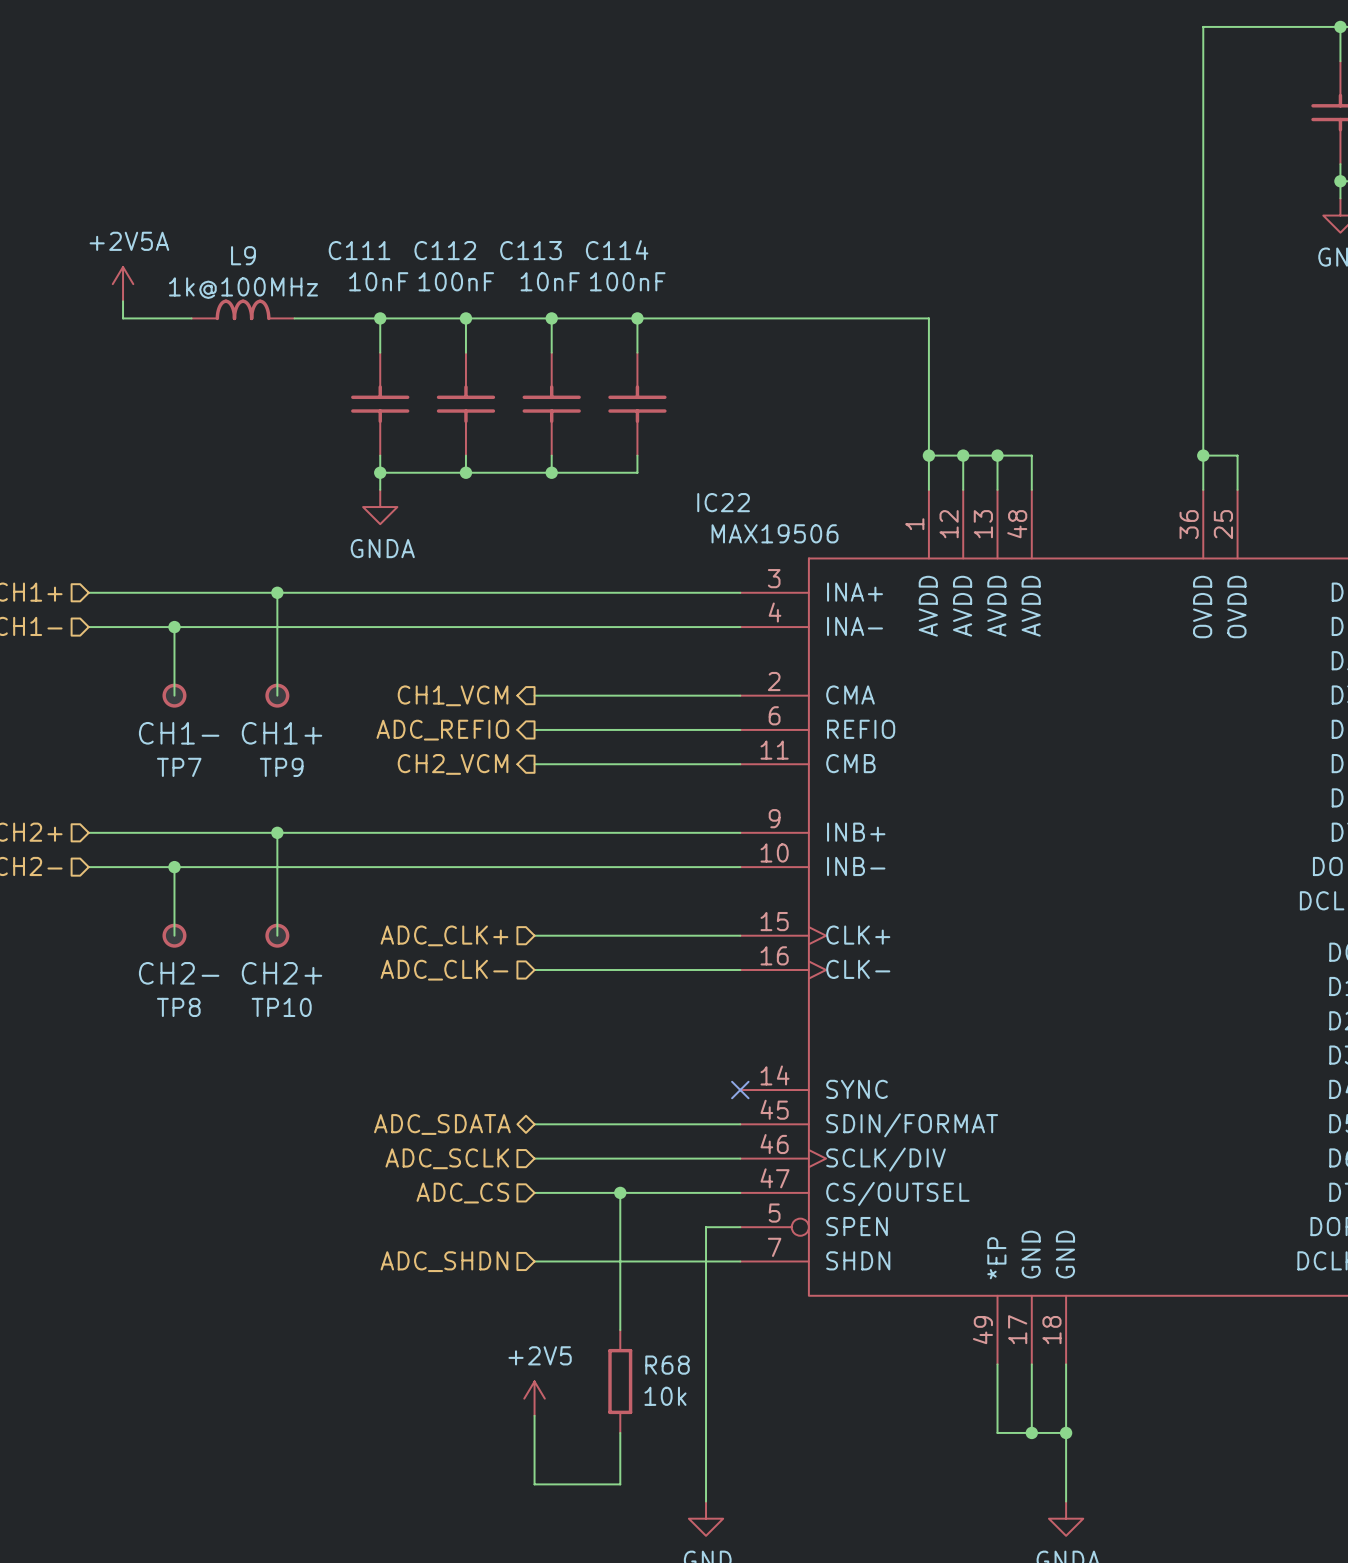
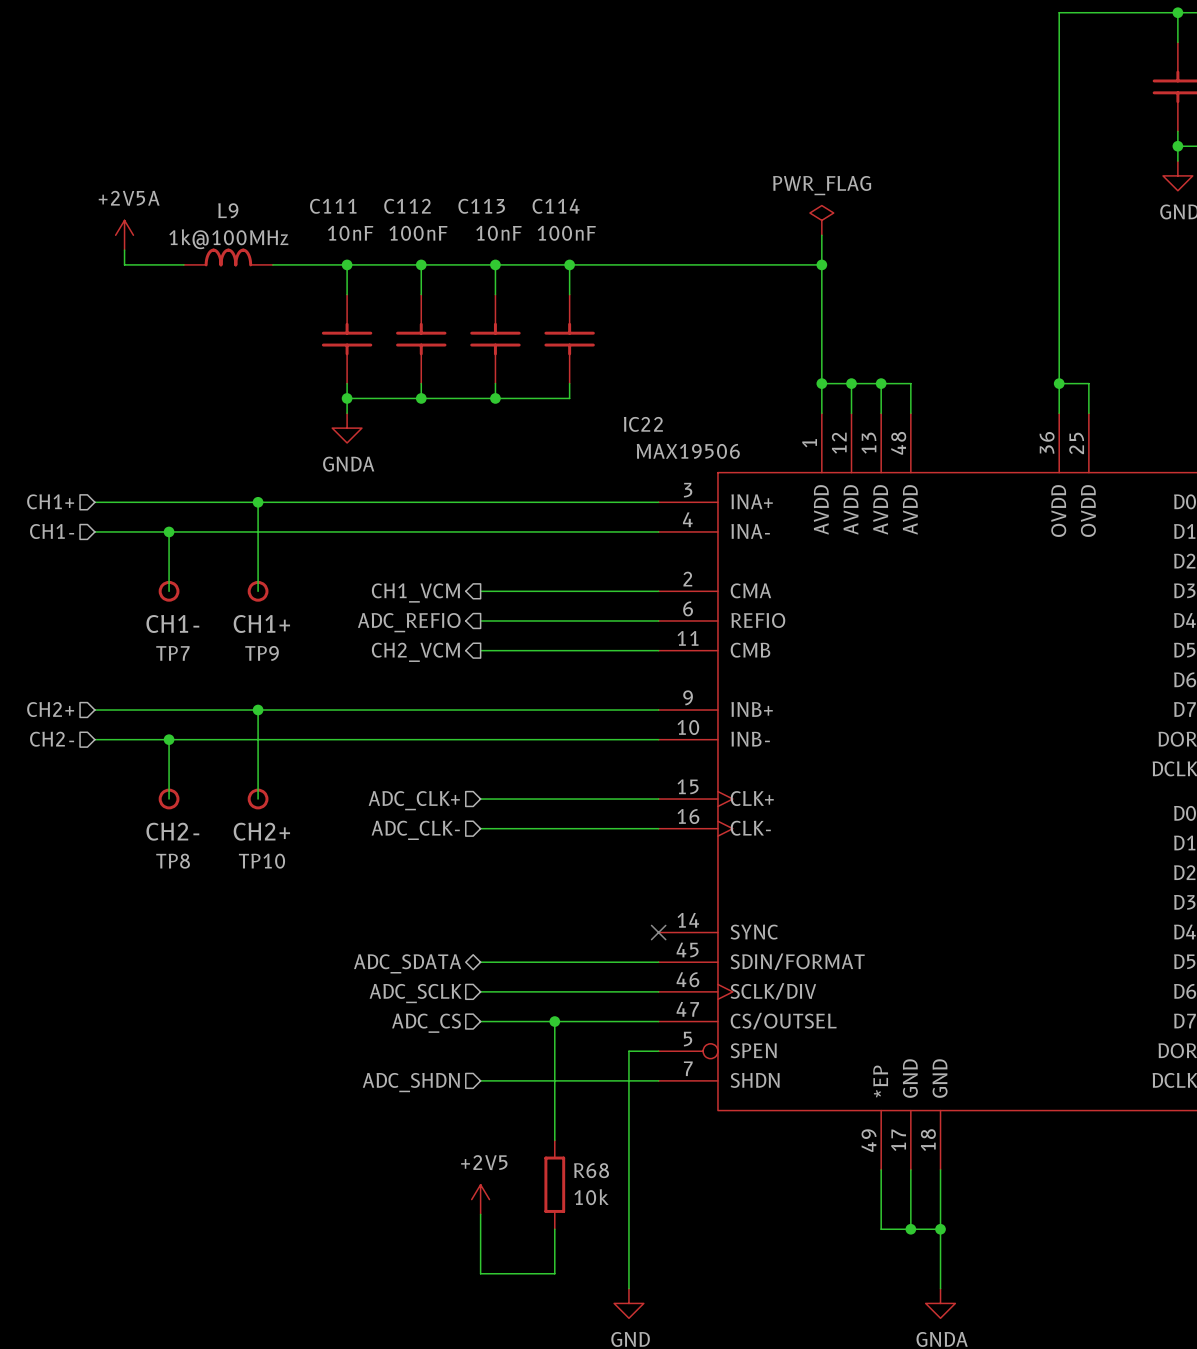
power symbol: none -> PWR_FLAG (821, 220)
wire: none -> (821, 235) (821, 264)
junction: none -> (821, 264)

